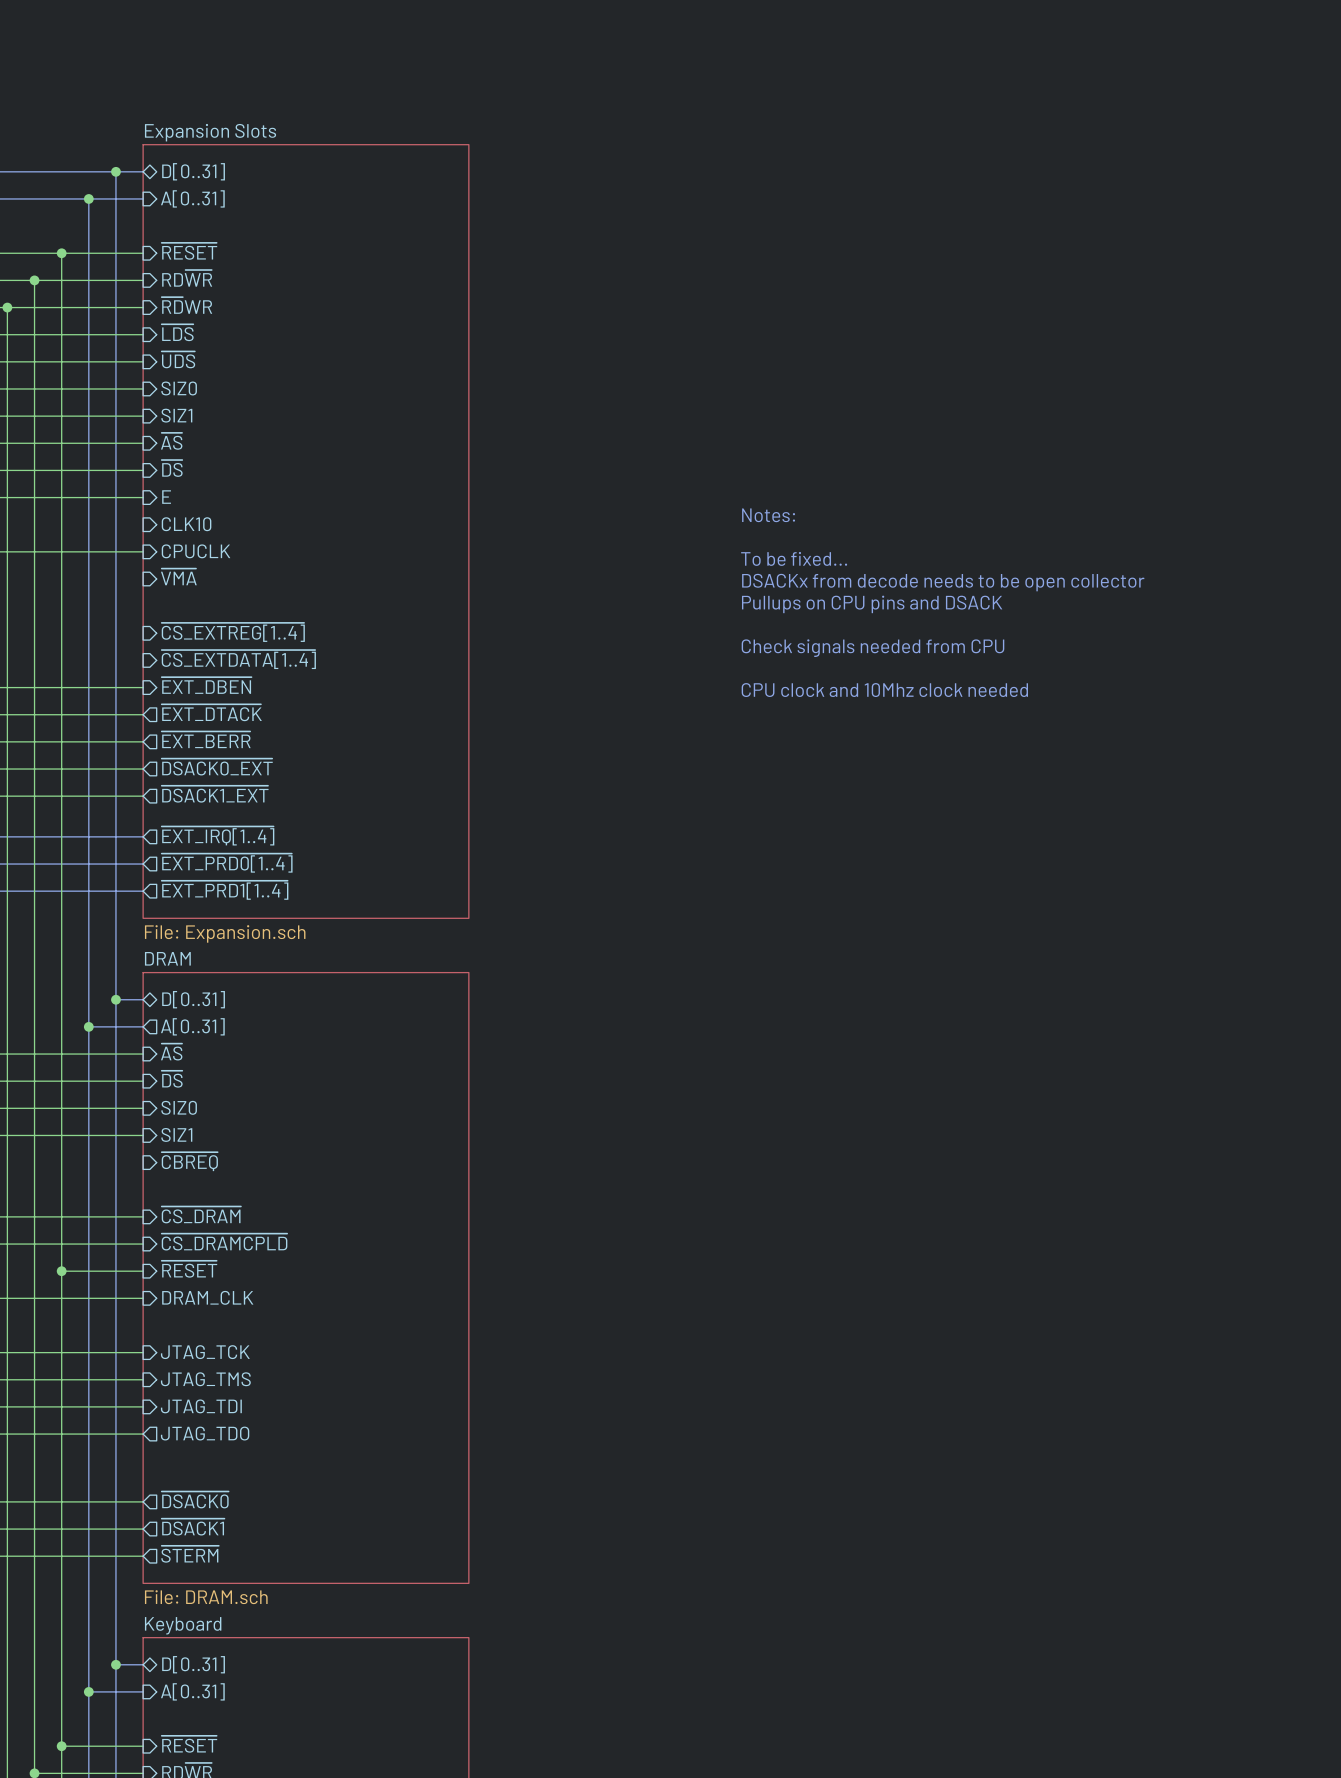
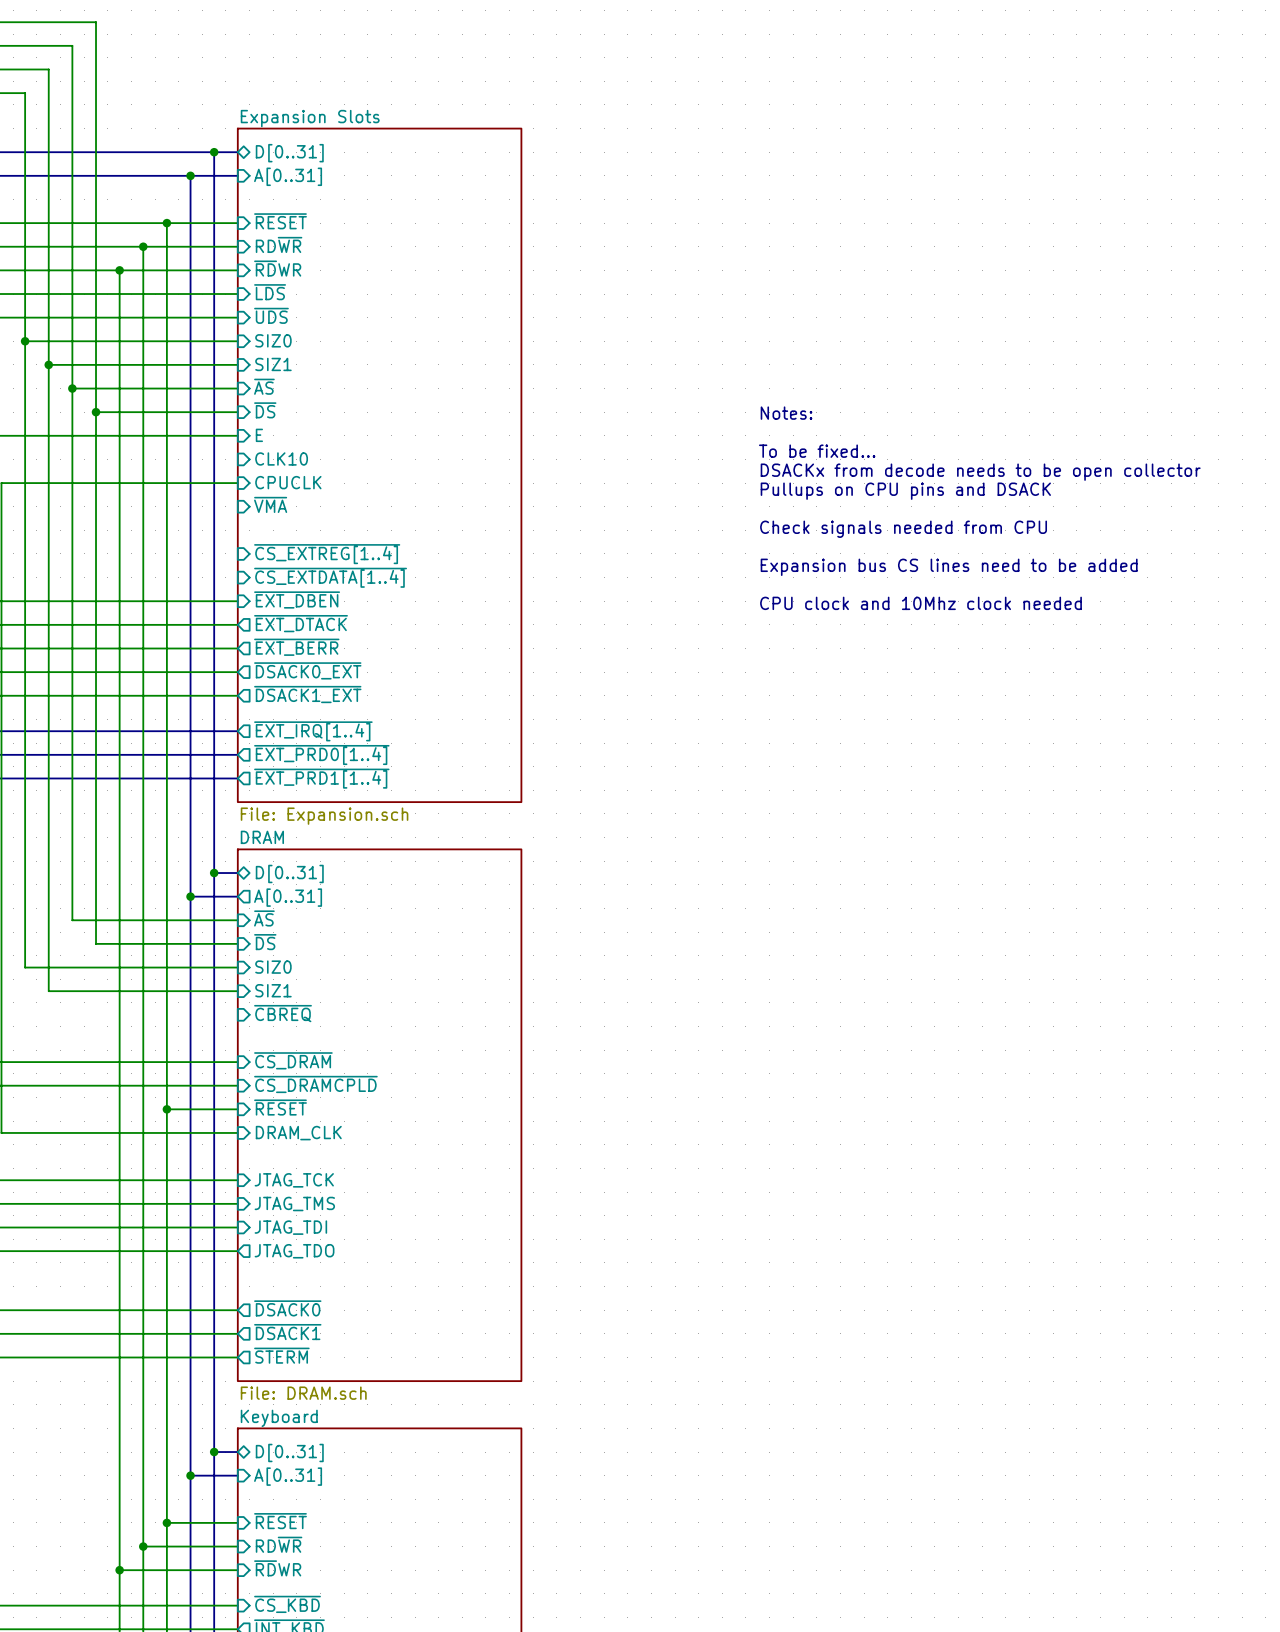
text: none -> Notes: (786, 413)
text: Notes: (768, 515) -> To be fixed... (817, 451)
text: To be fixed... (794, 558) -> Pullups on CPU pins and DSACK (905, 491)
text position: DSACKx from decode needs to be open collector (943, 582) -> DSACKx from decode needs to be open collector (980, 472)
text: Pullups on CPU pins and DSACK (872, 604) -> Check signals needed from CPU (903, 529)
text: Check signals needed from CPU (872, 648) -> Expansion bus CS lines need to be added (949, 567)

